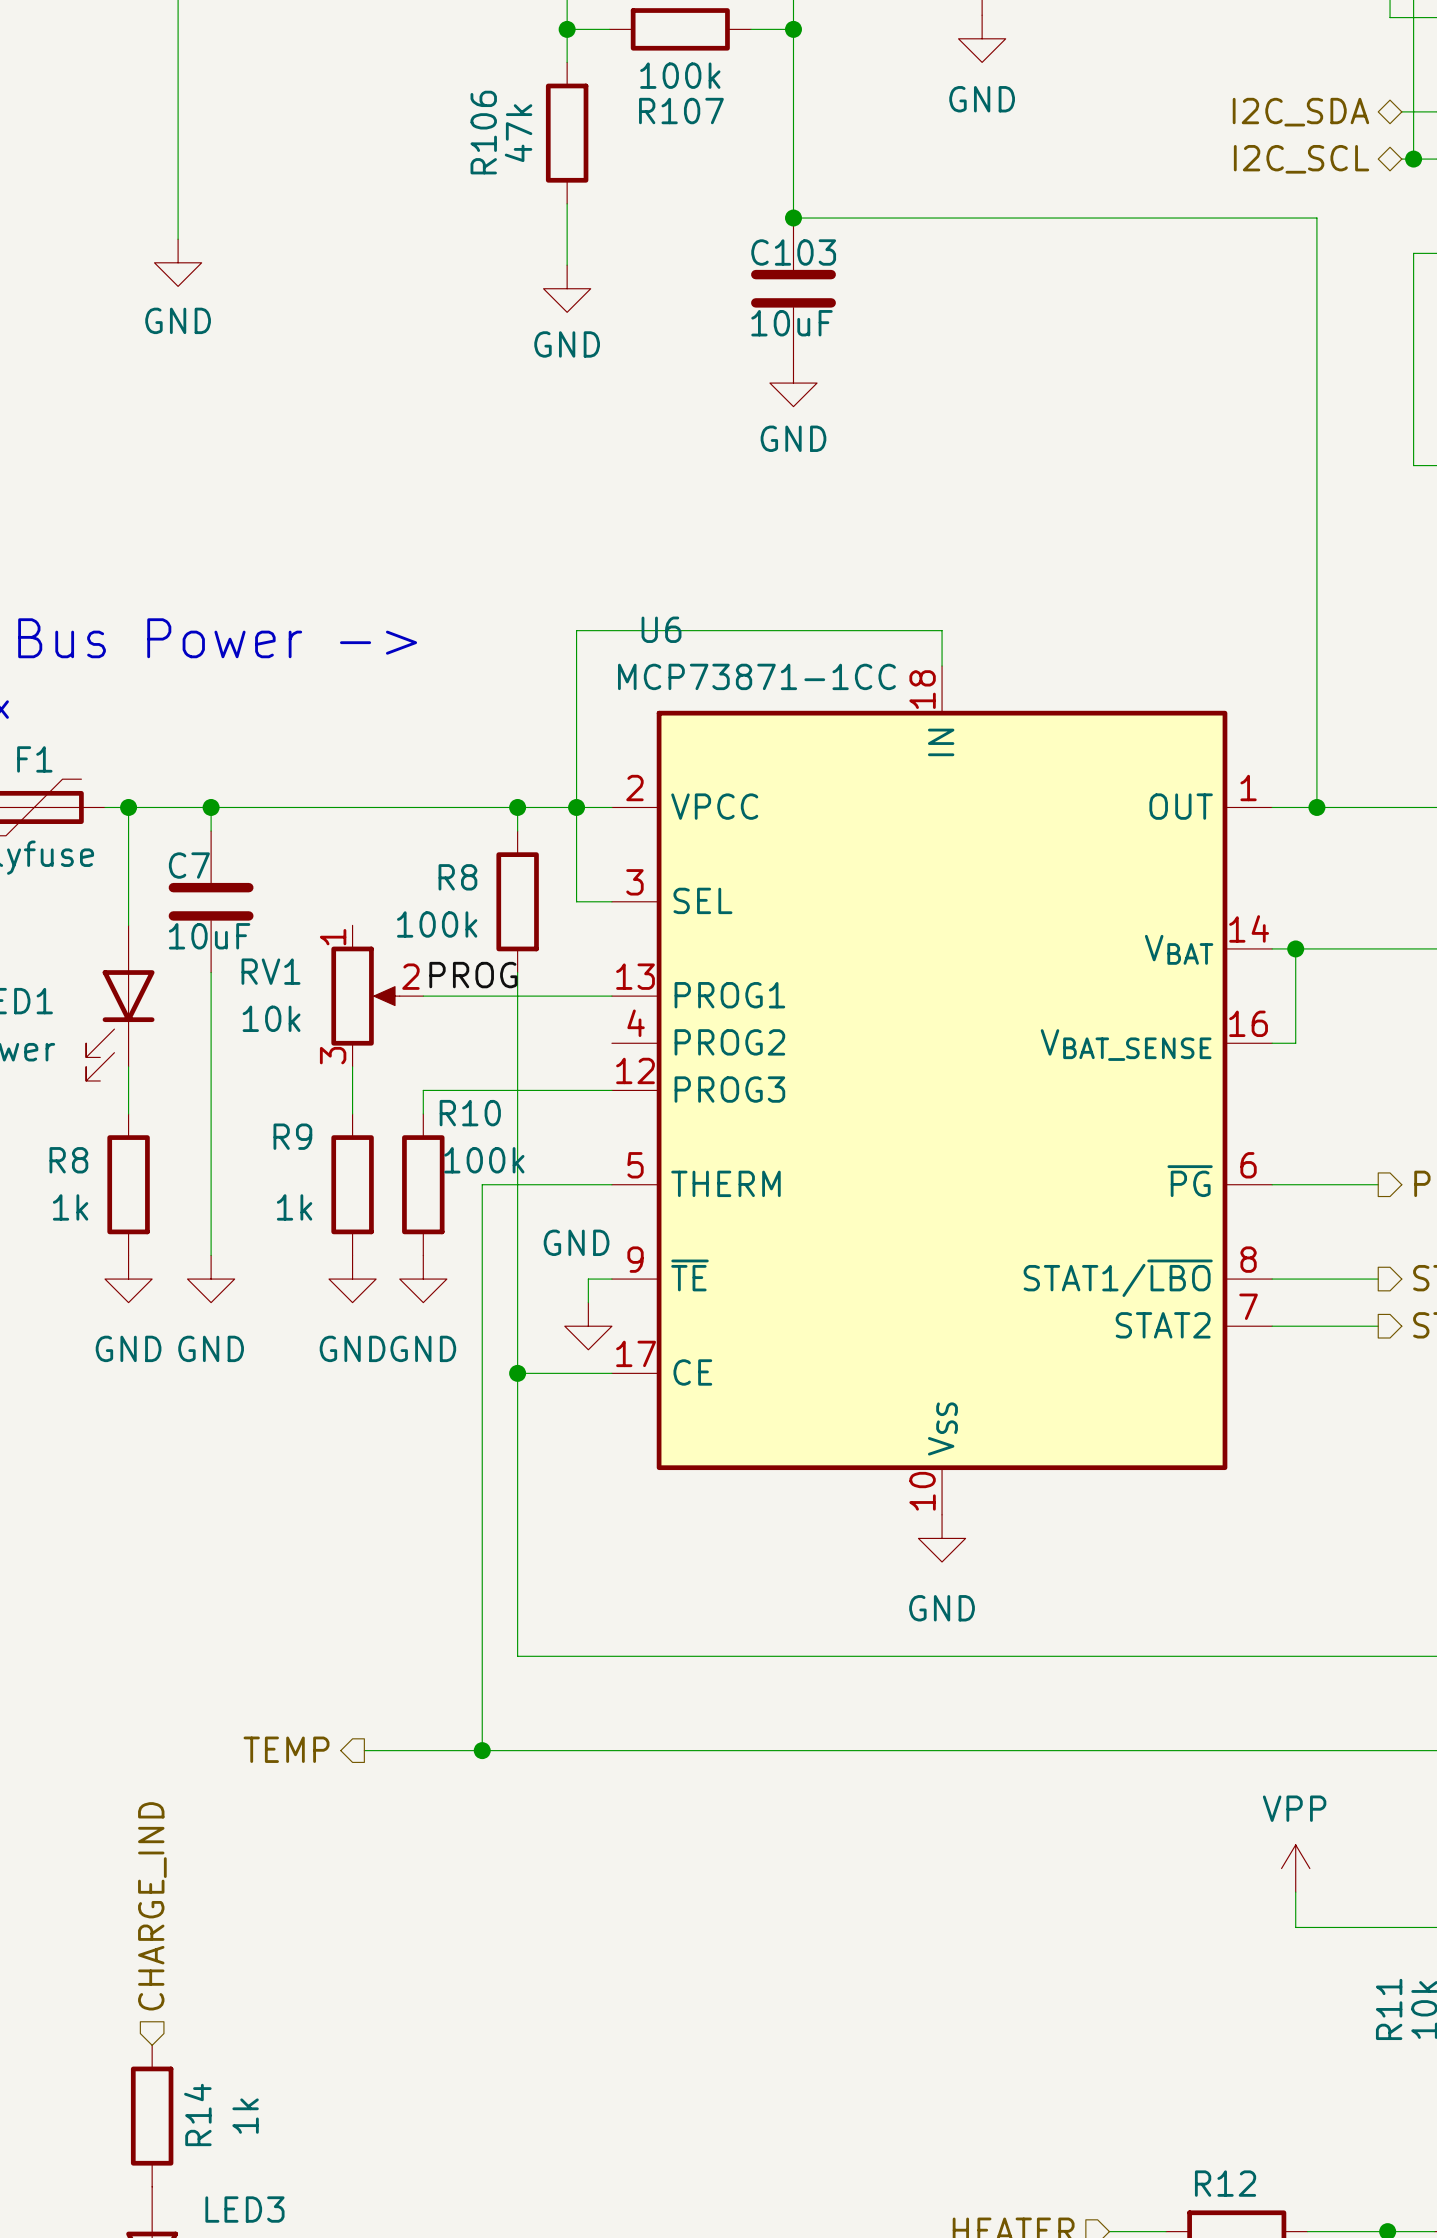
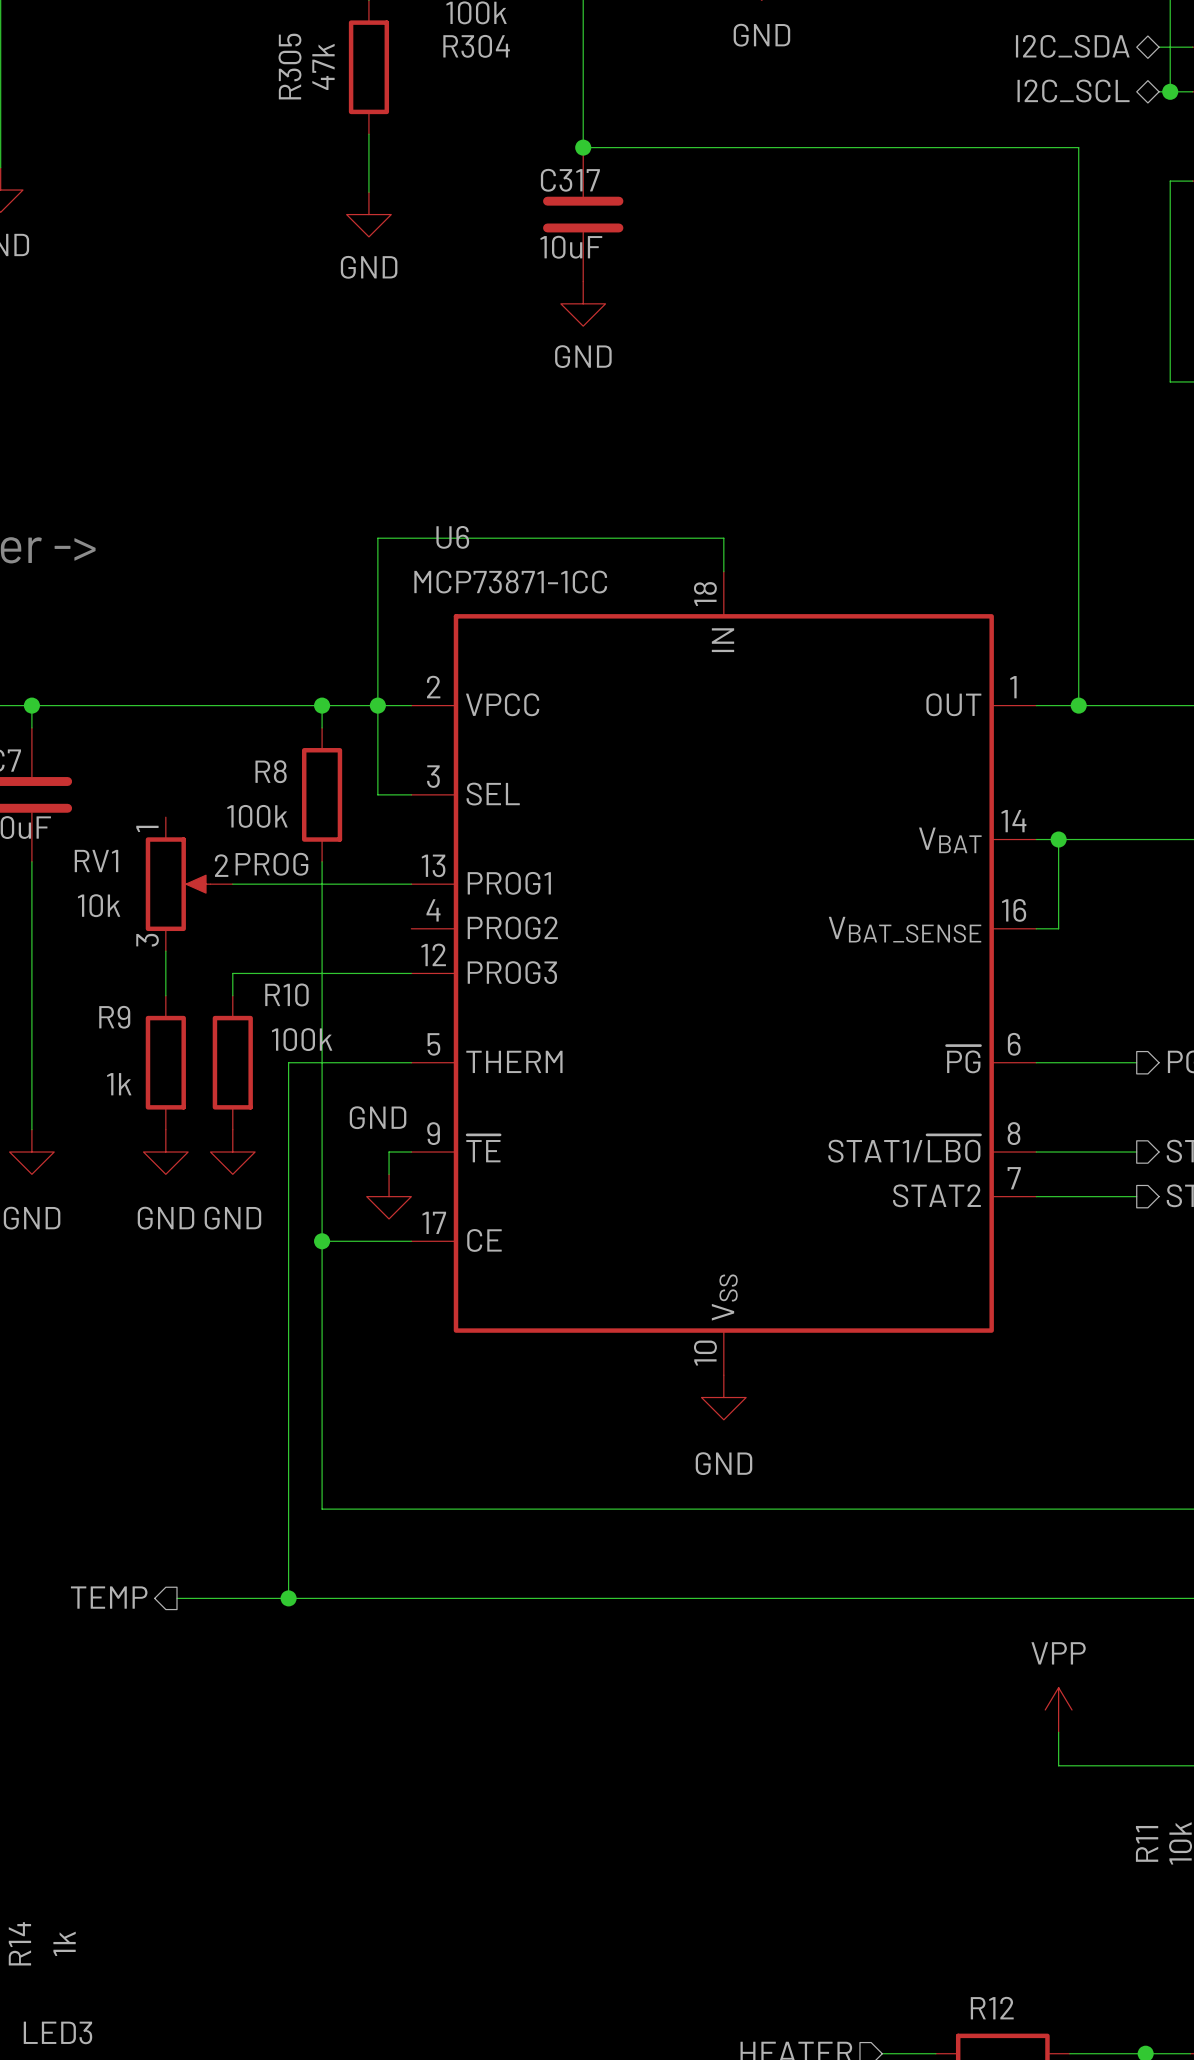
R107 name: R107 (681, 111) -> R304 (476, 46)
R106 name: R106 (483, 132) -> R305 (290, 66)
C103 name: C103 (793, 252) -> C317 (570, 180)

